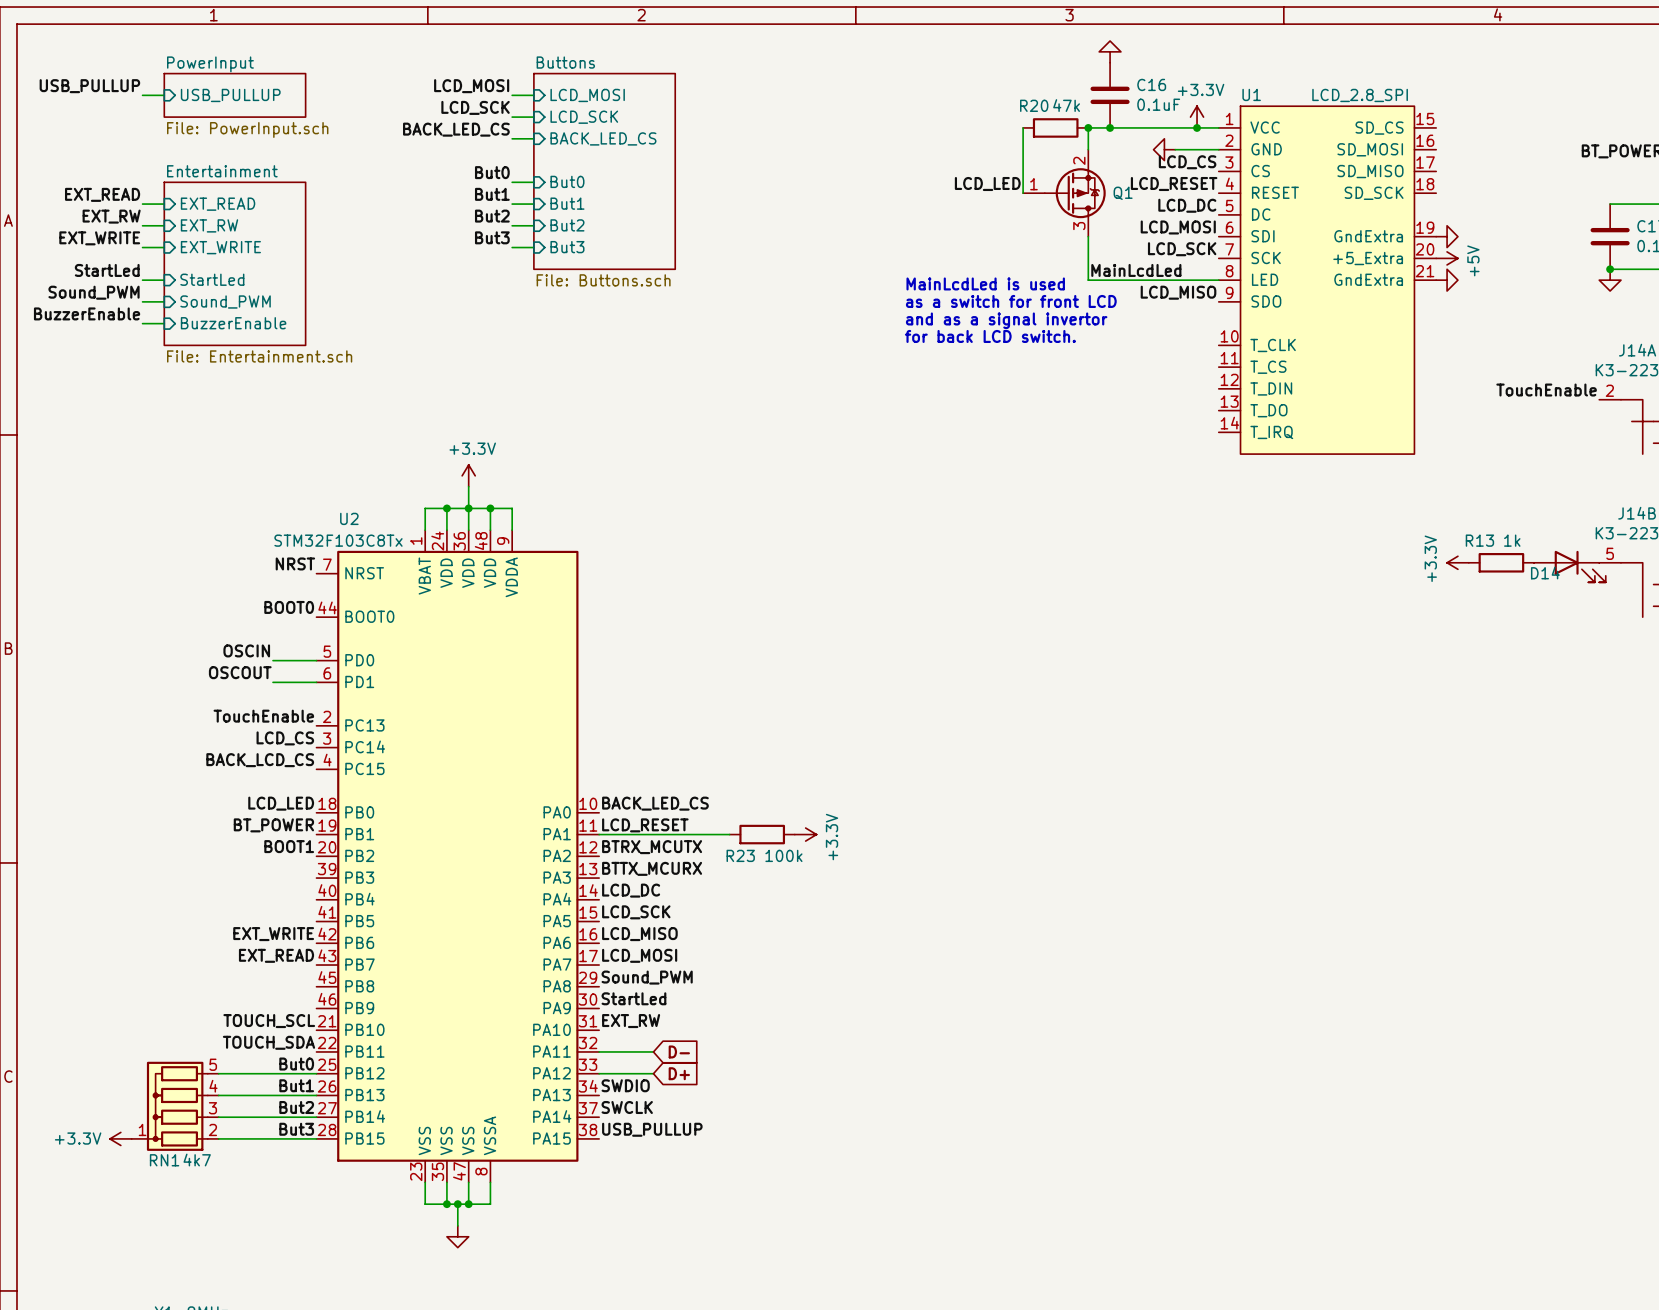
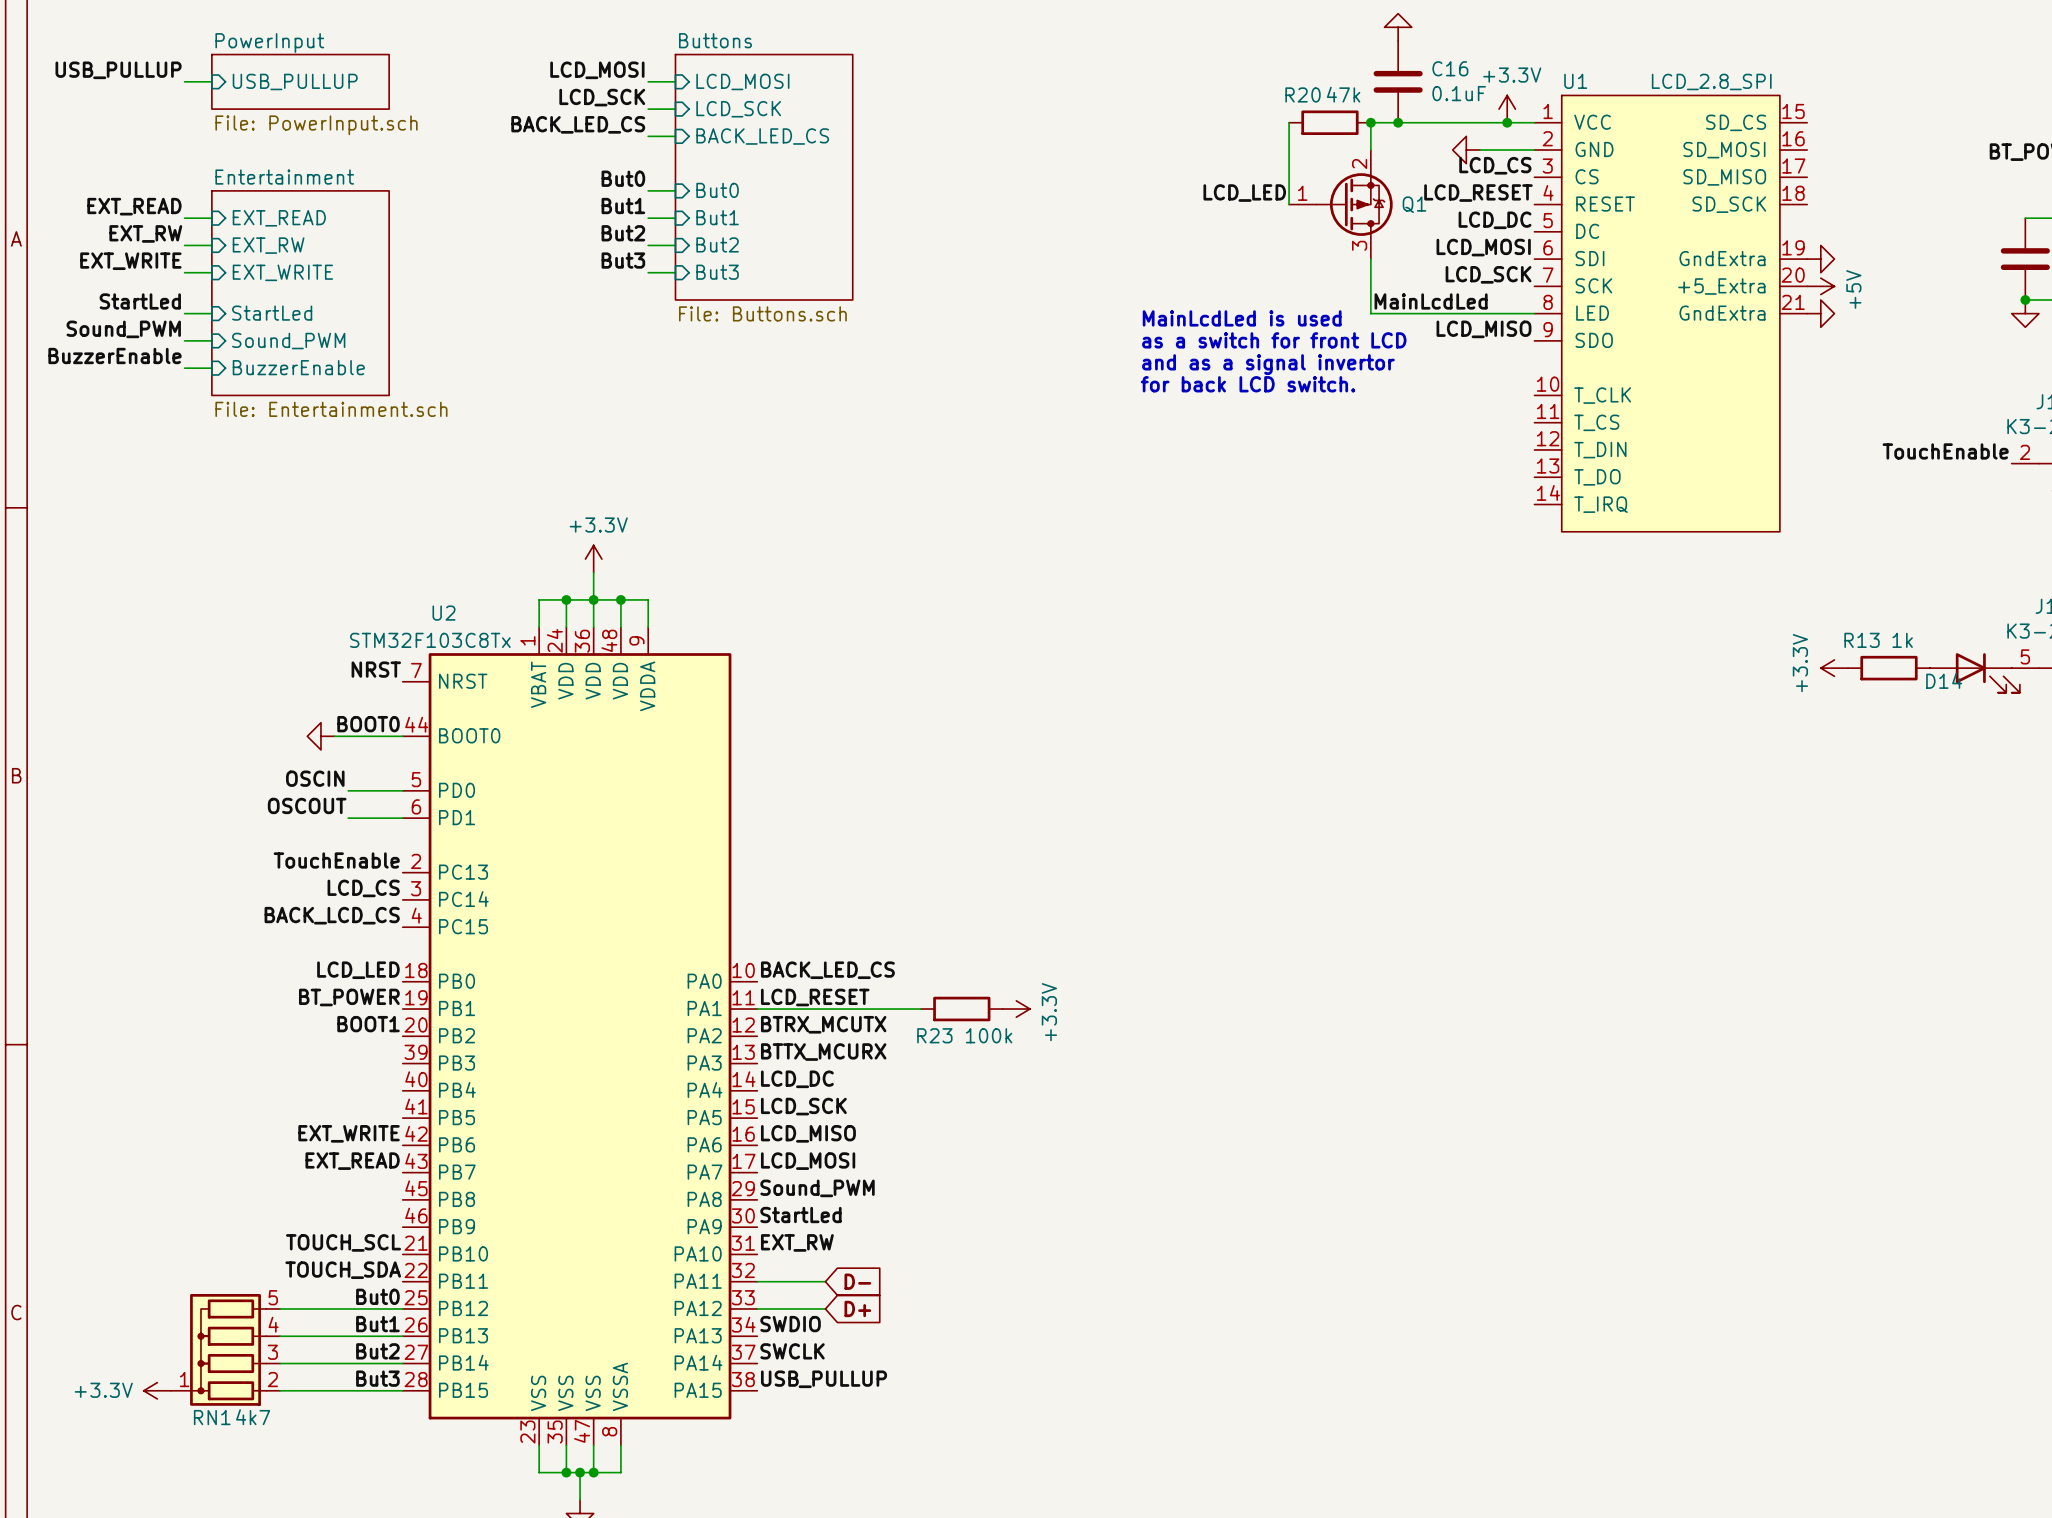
power symbol: none -> (320, 736)
wire: none -> (334, 736) (402, 736)

